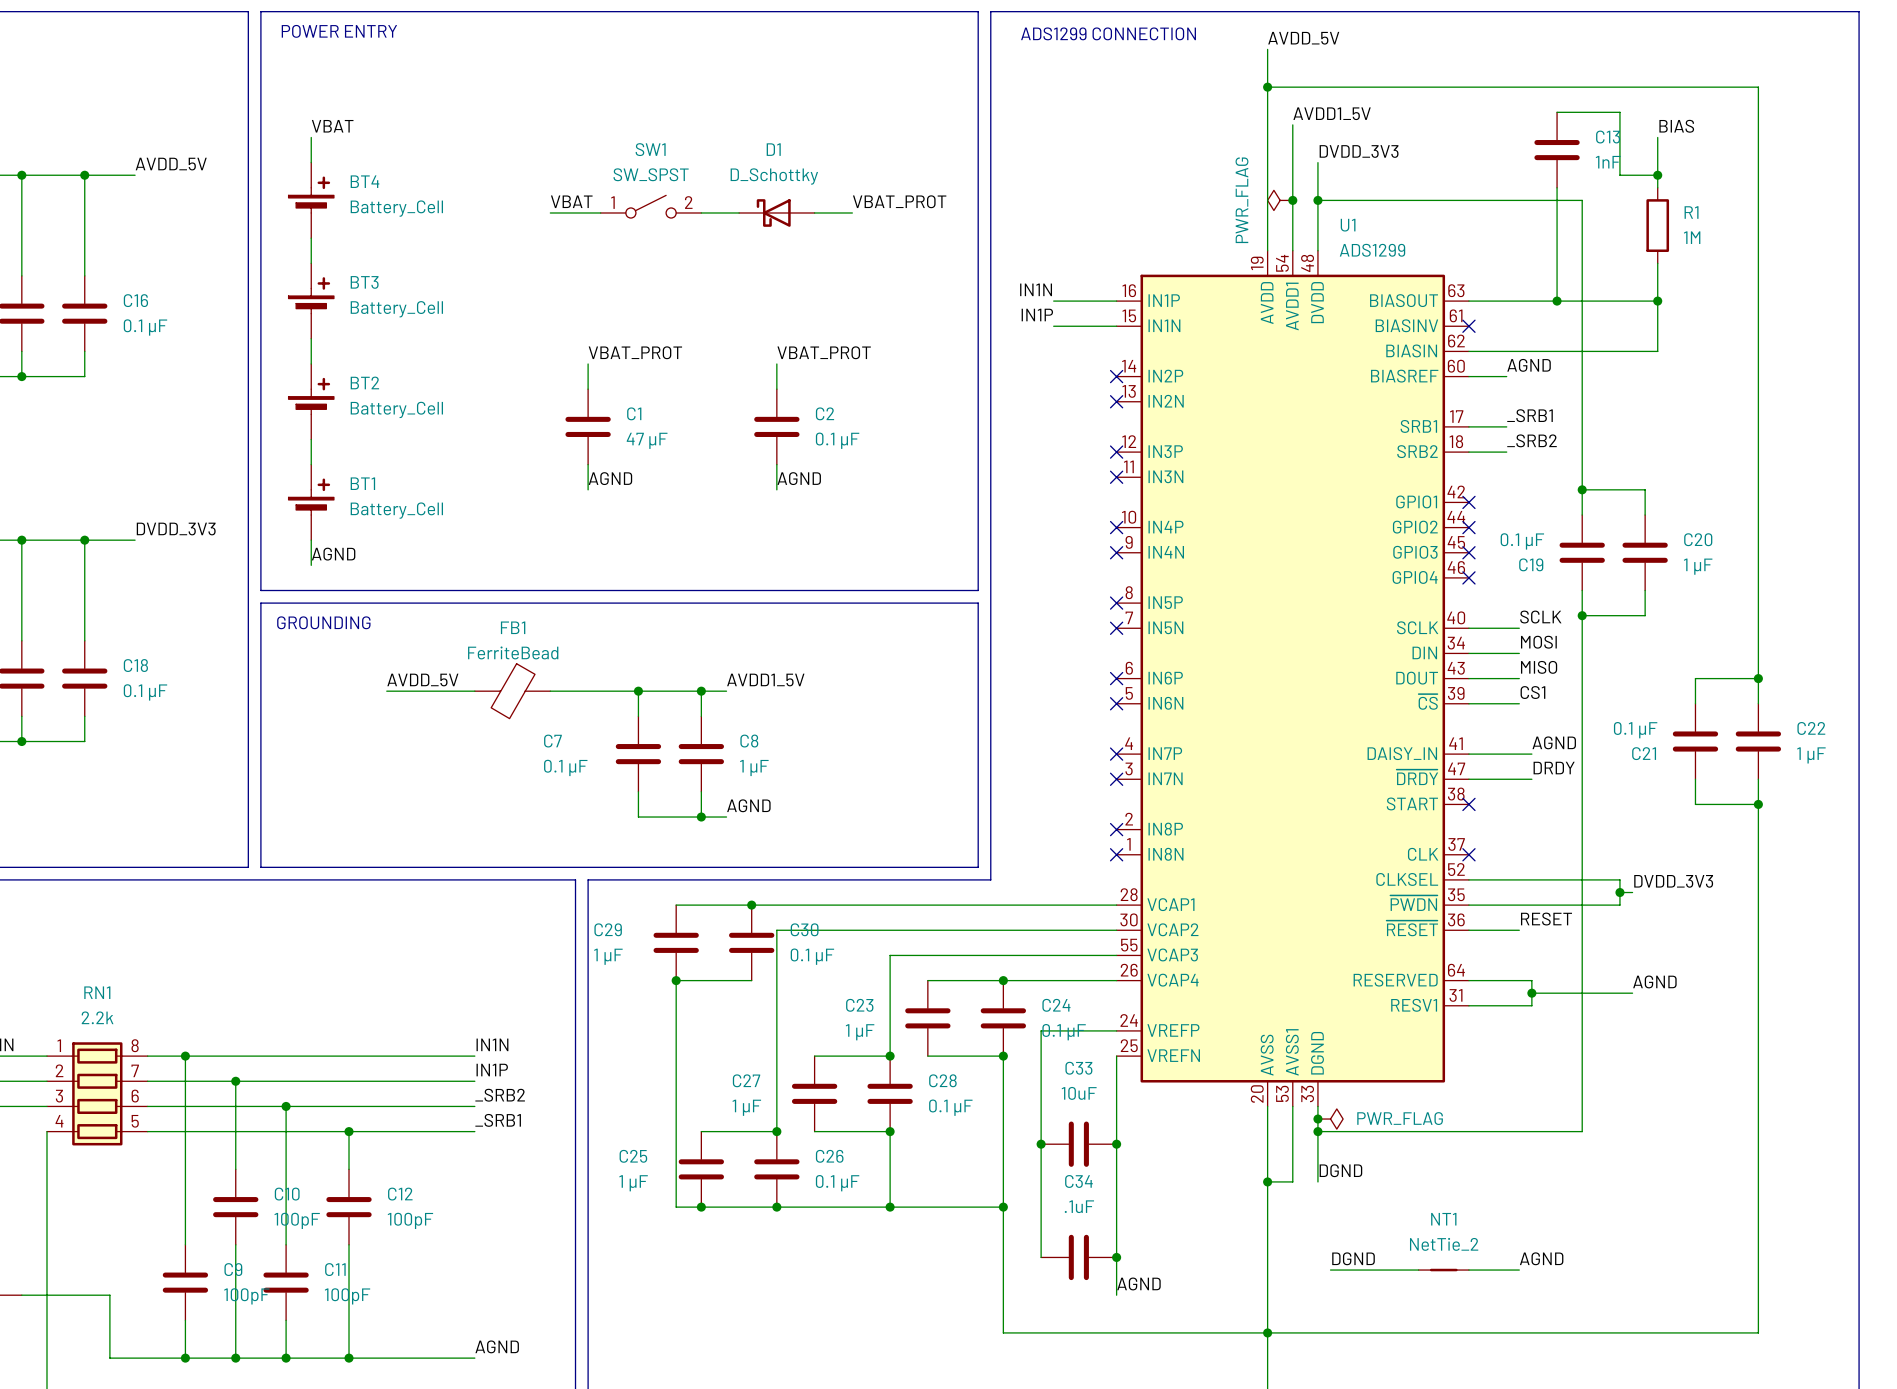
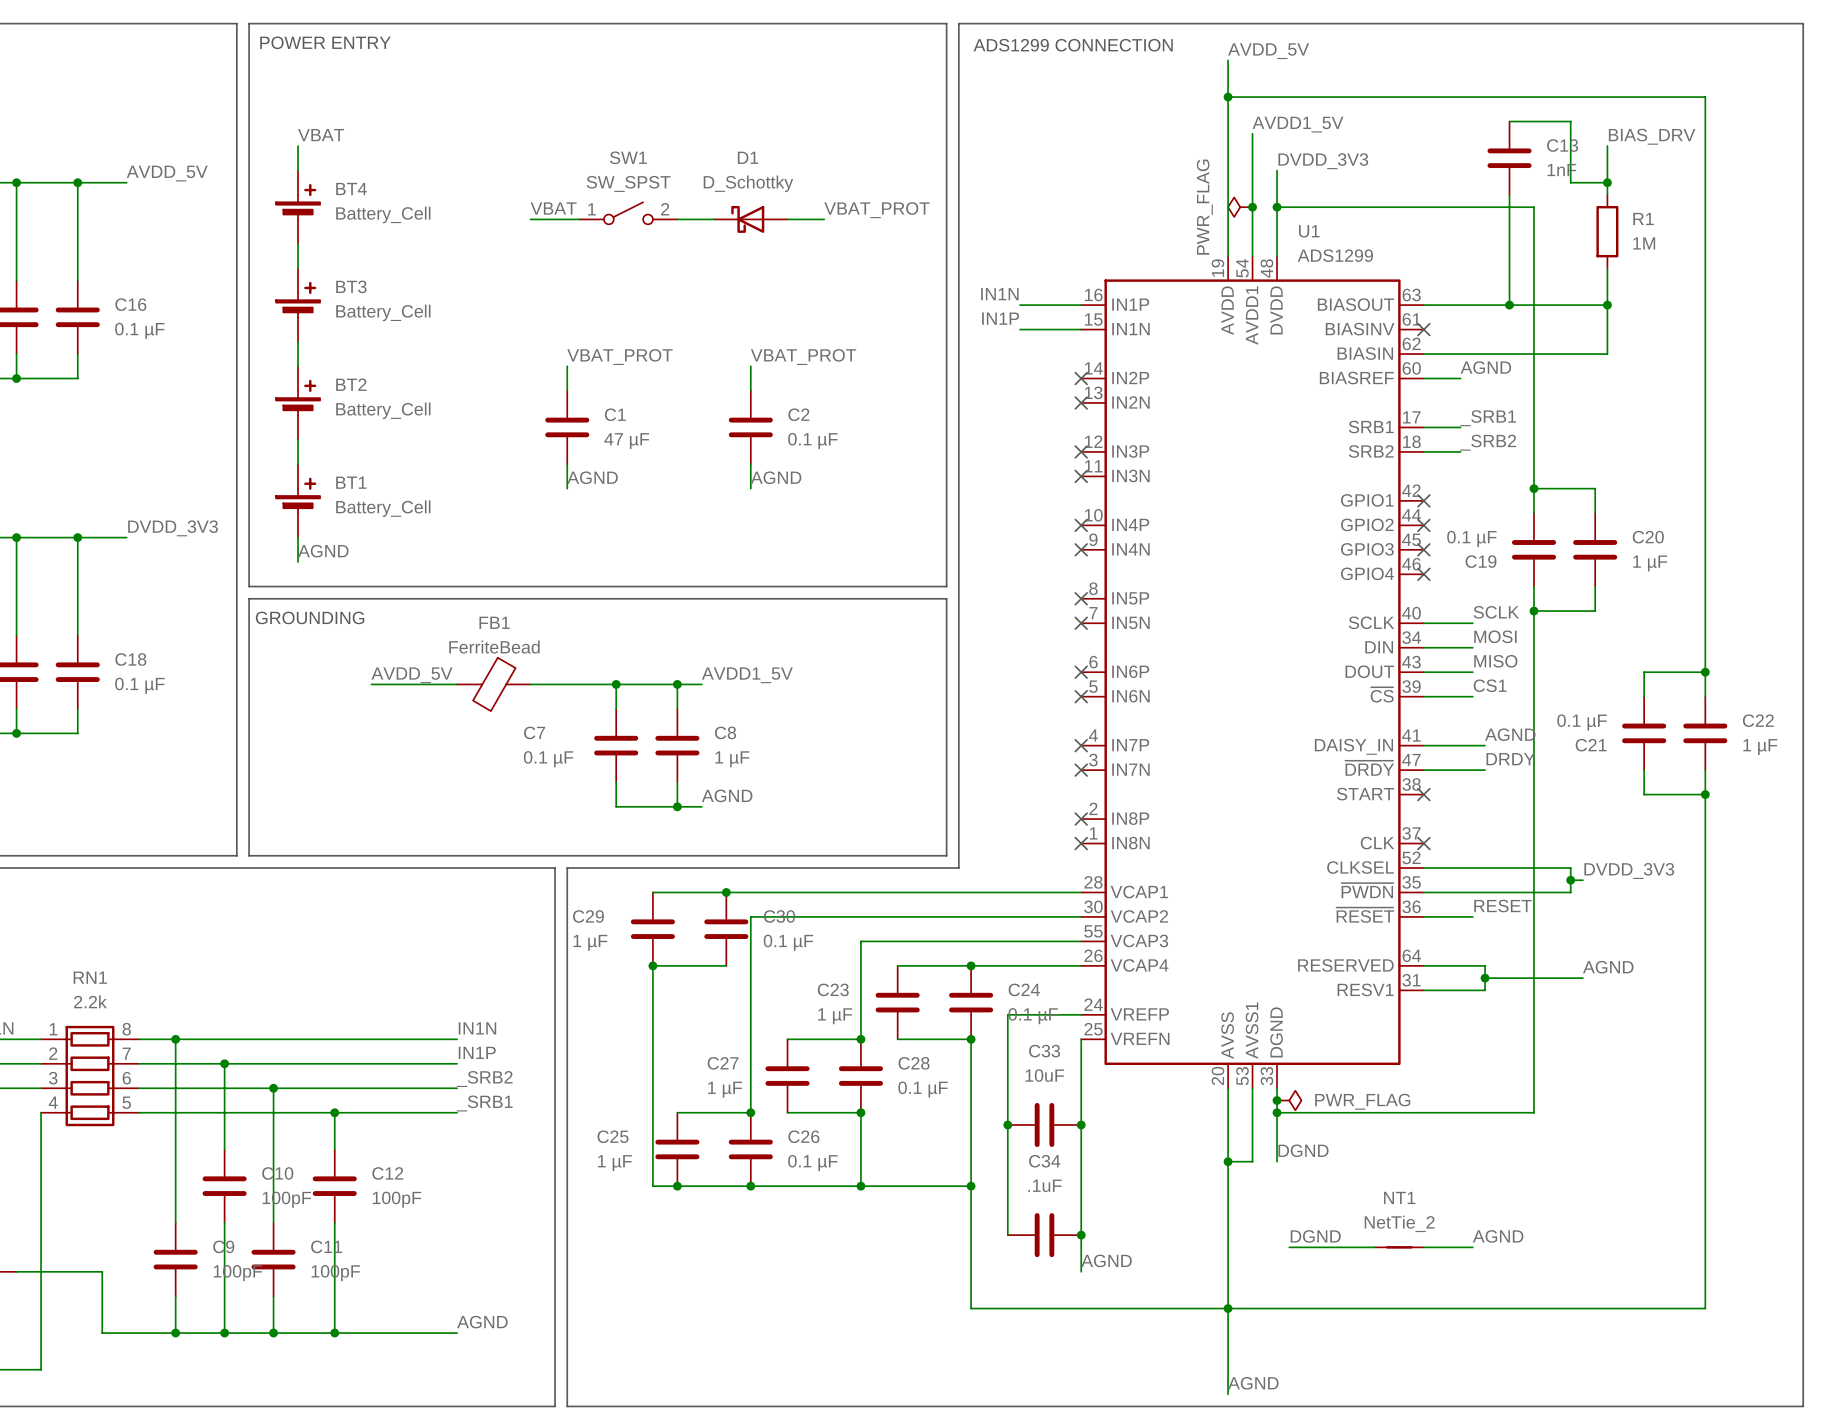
label: BIAS (1676, 126) -> BIAS_DRV (1652, 136)

